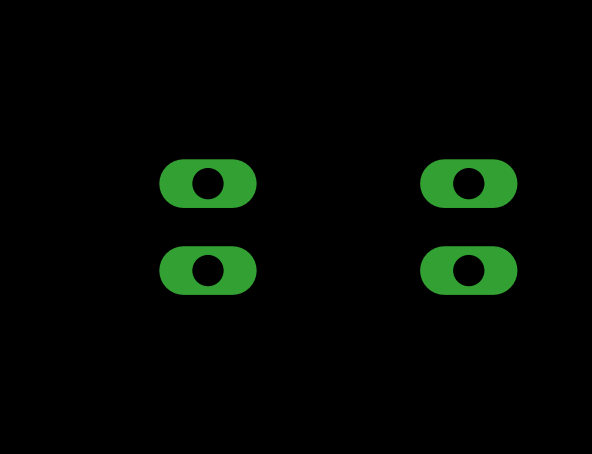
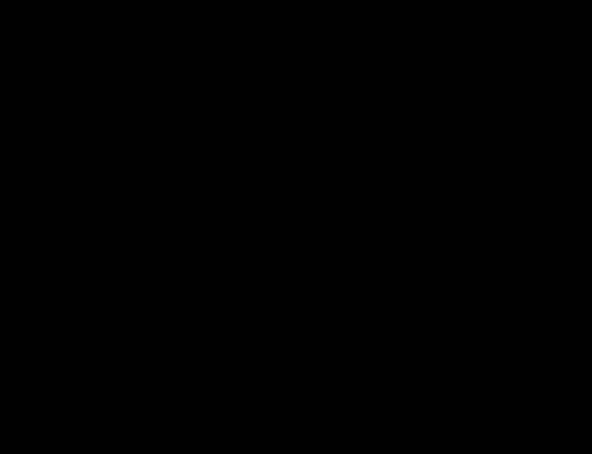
part: (207, 227) -> none
part: (468, 227) -> none

